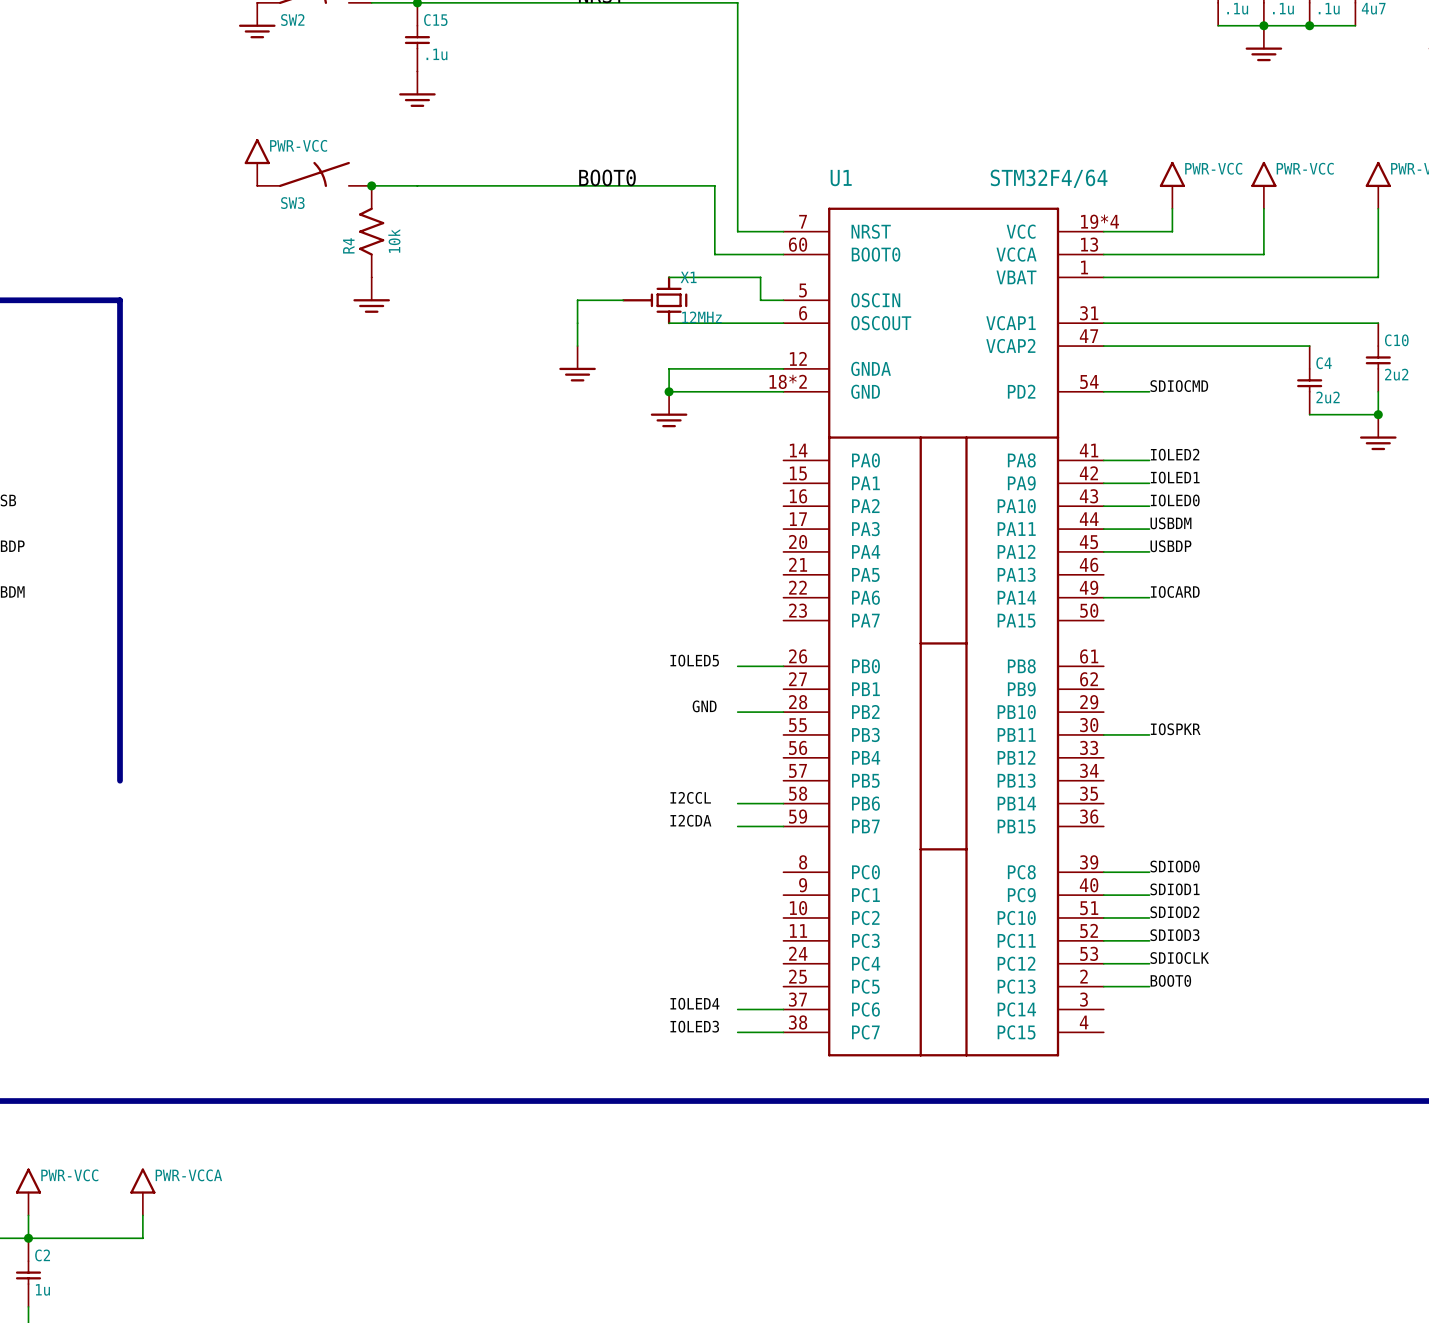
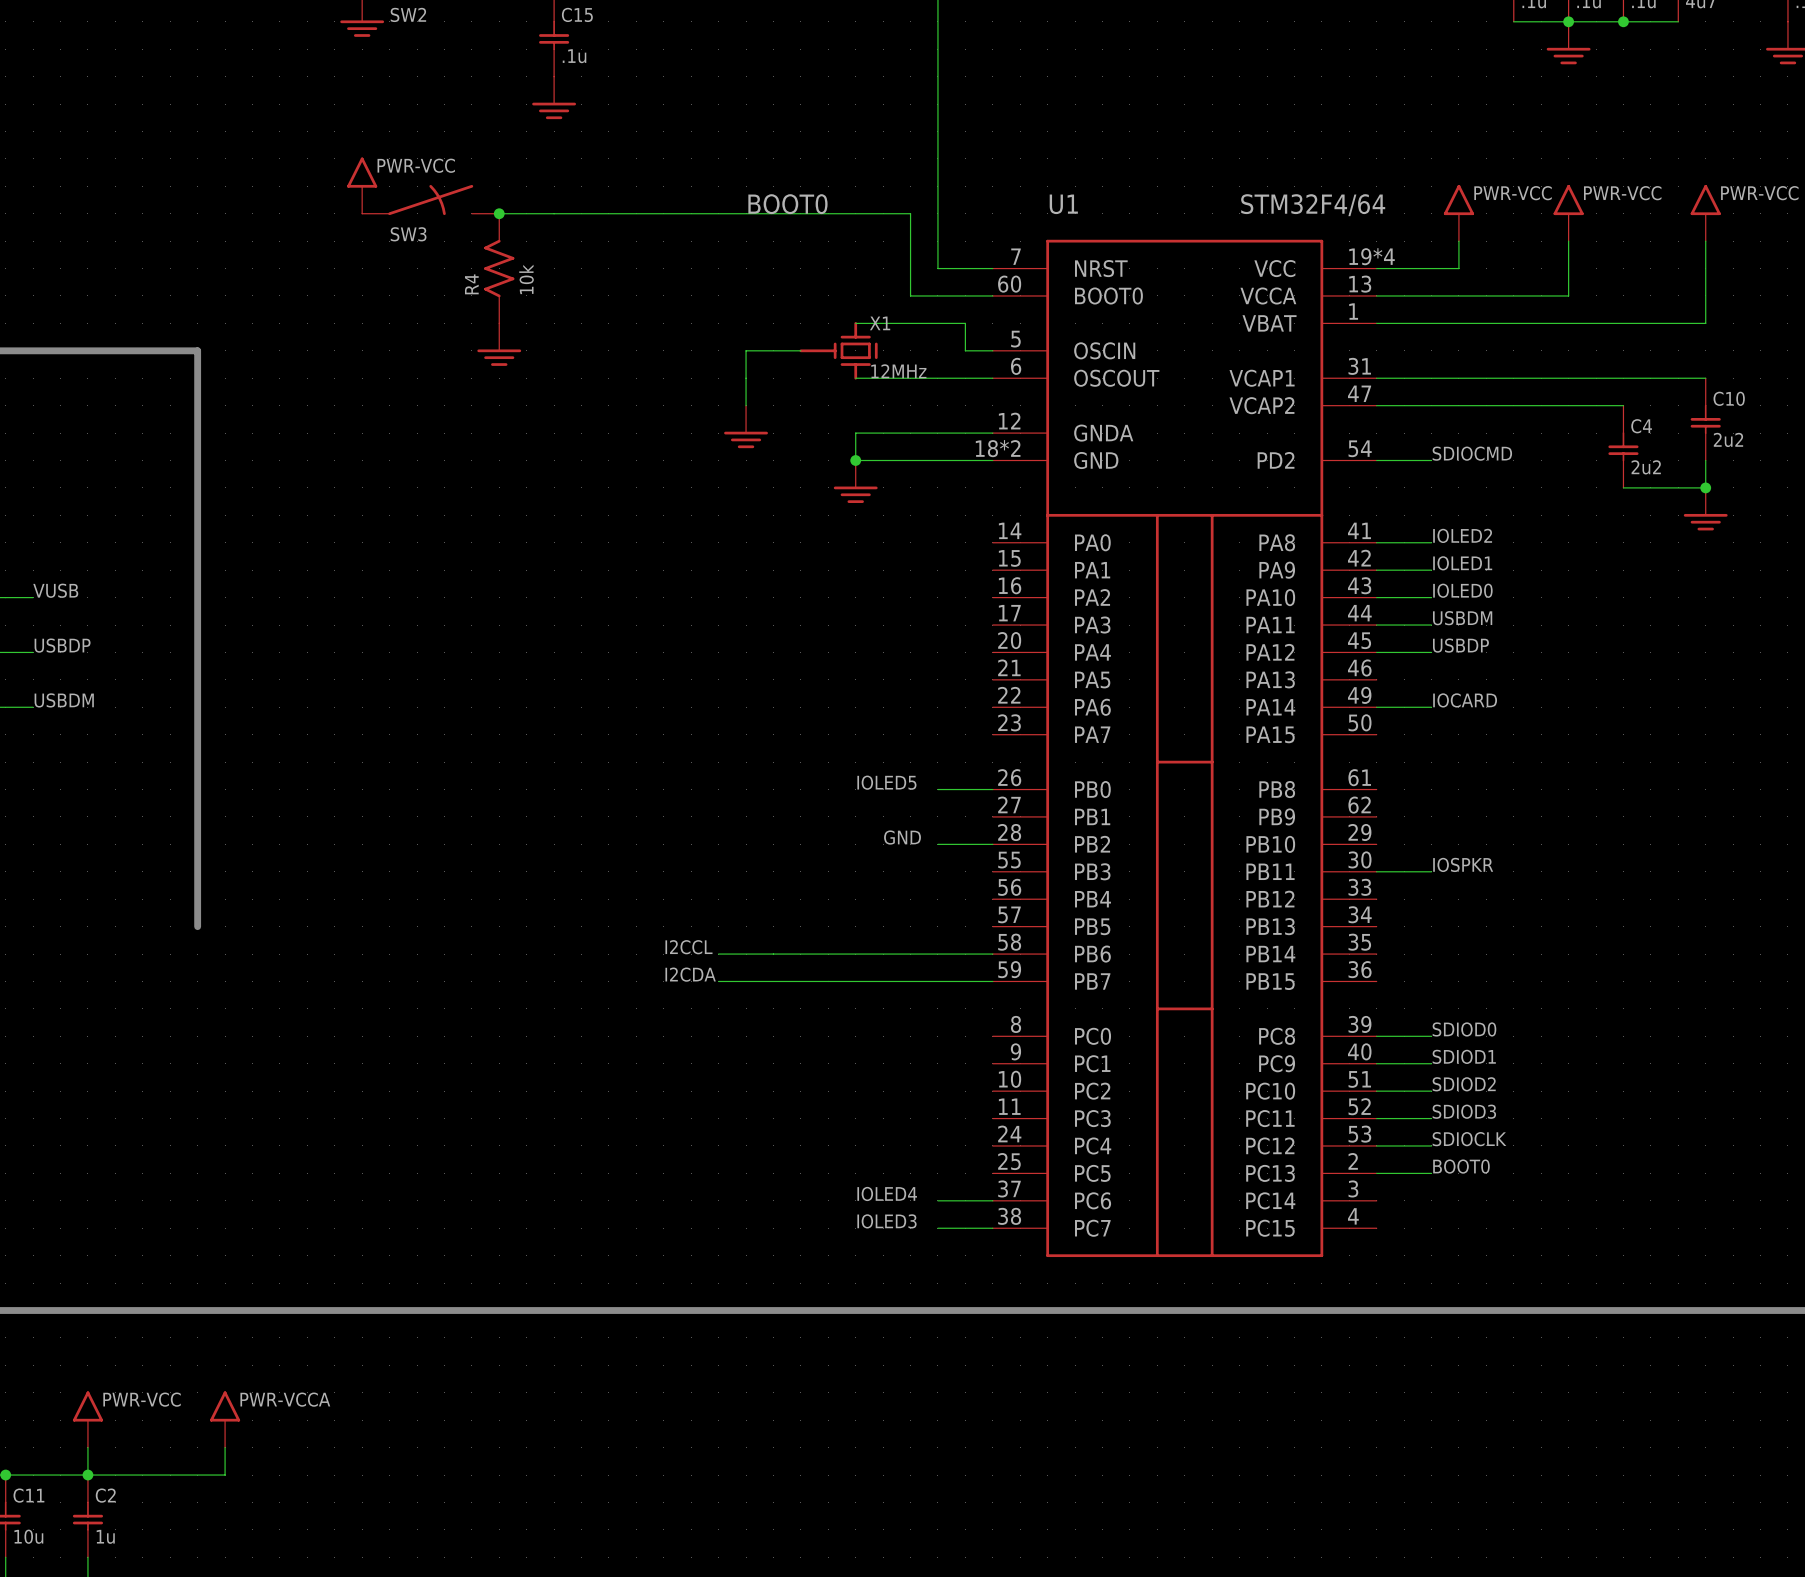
label position: I2CCL (690, 797) -> I2CCL (688, 947)
wire: none -> (718, 954) (937, 954)
label position: I2CDA (690, 820) -> I2CDA (690, 974)
wire: none -> (718, 981) (937, 981)

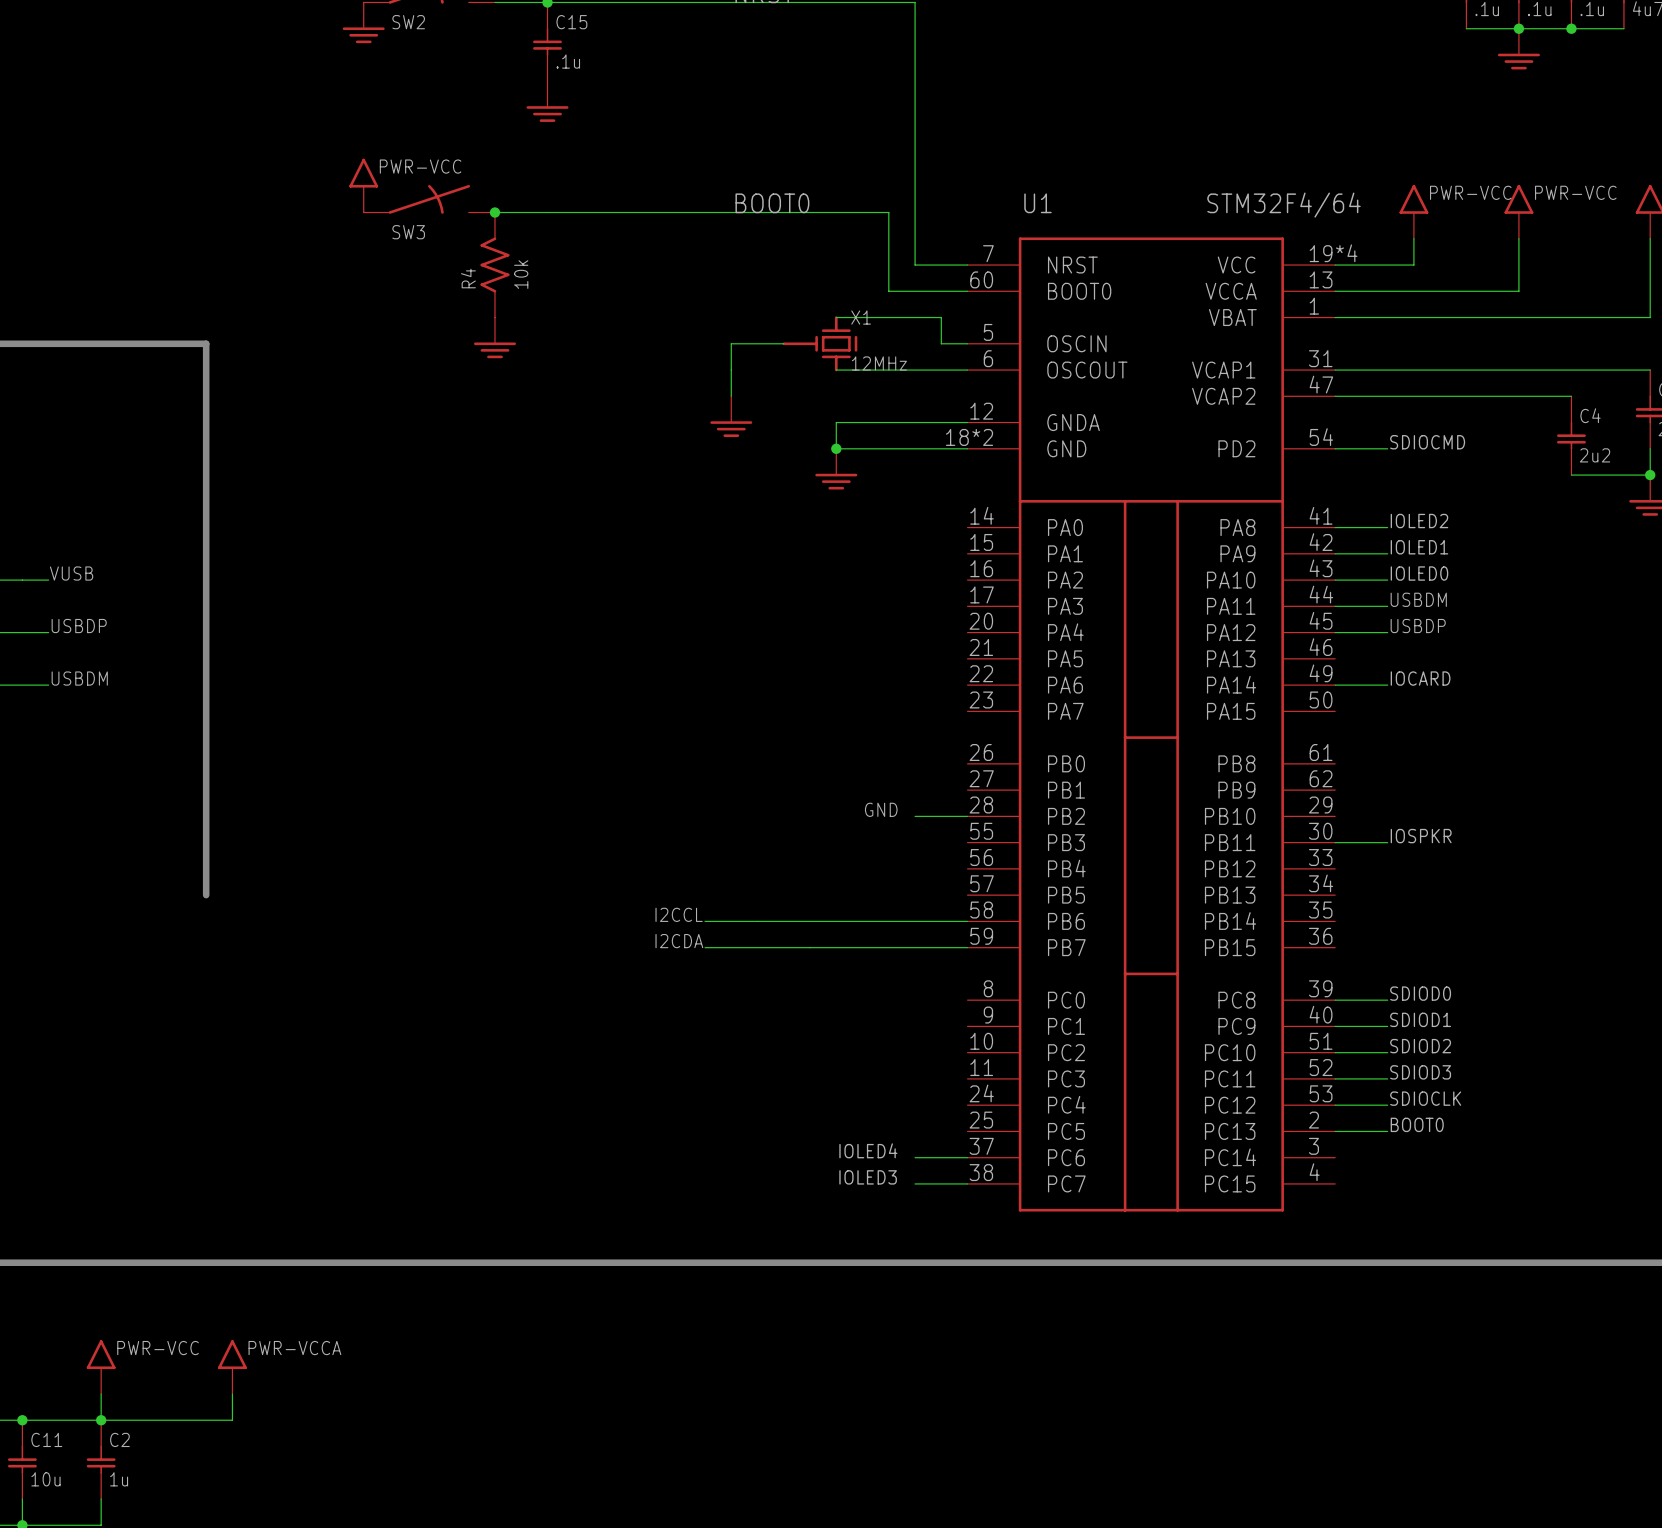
label: IOLED5 (886, 782) -> none
wire: (937, 789) (992, 789) -> none

